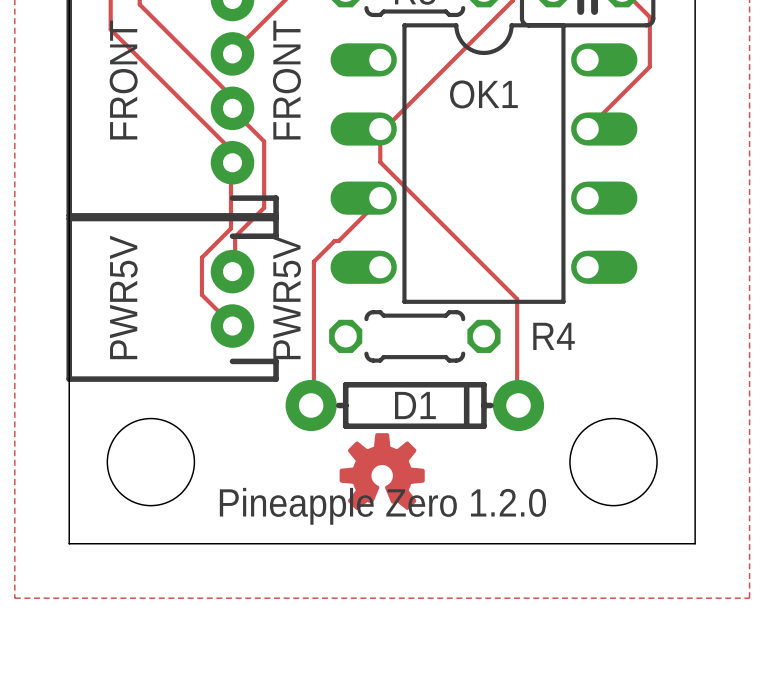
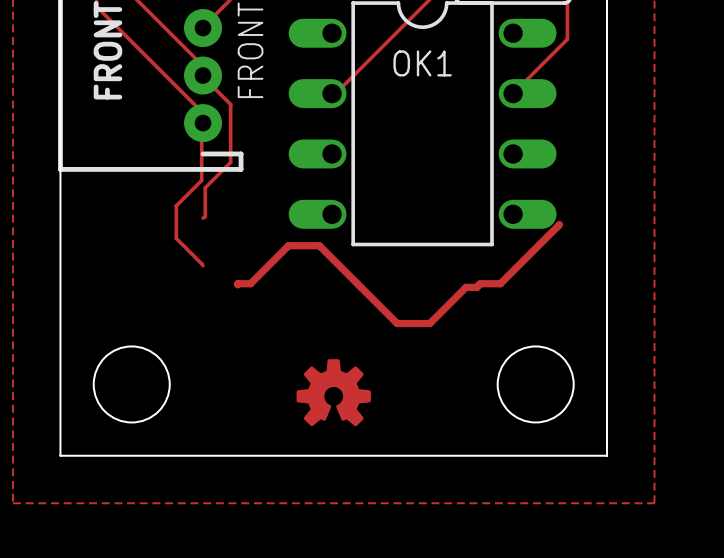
track: (380, 129) (380, 162) (517, 299) (518, 405) -> none
track: (380, 198) (338, 240) (334, 240) (313, 261) (313, 402) (311, 405) -> none
track: none -> (559, 224) (500, 283) (480, 283) (476, 287) (466, 287) (429, 323) (397, 323) (319, 245) (288, 245) (250, 283) (237, 284)
text: PWR5V (287, 297) -> none
PWR5V: (172, 298) -> none
R4: (414, 336) -> none
D1: (414, 405) -> none
text: Pineapple Zero 1.2.0 (382, 506) -> none

